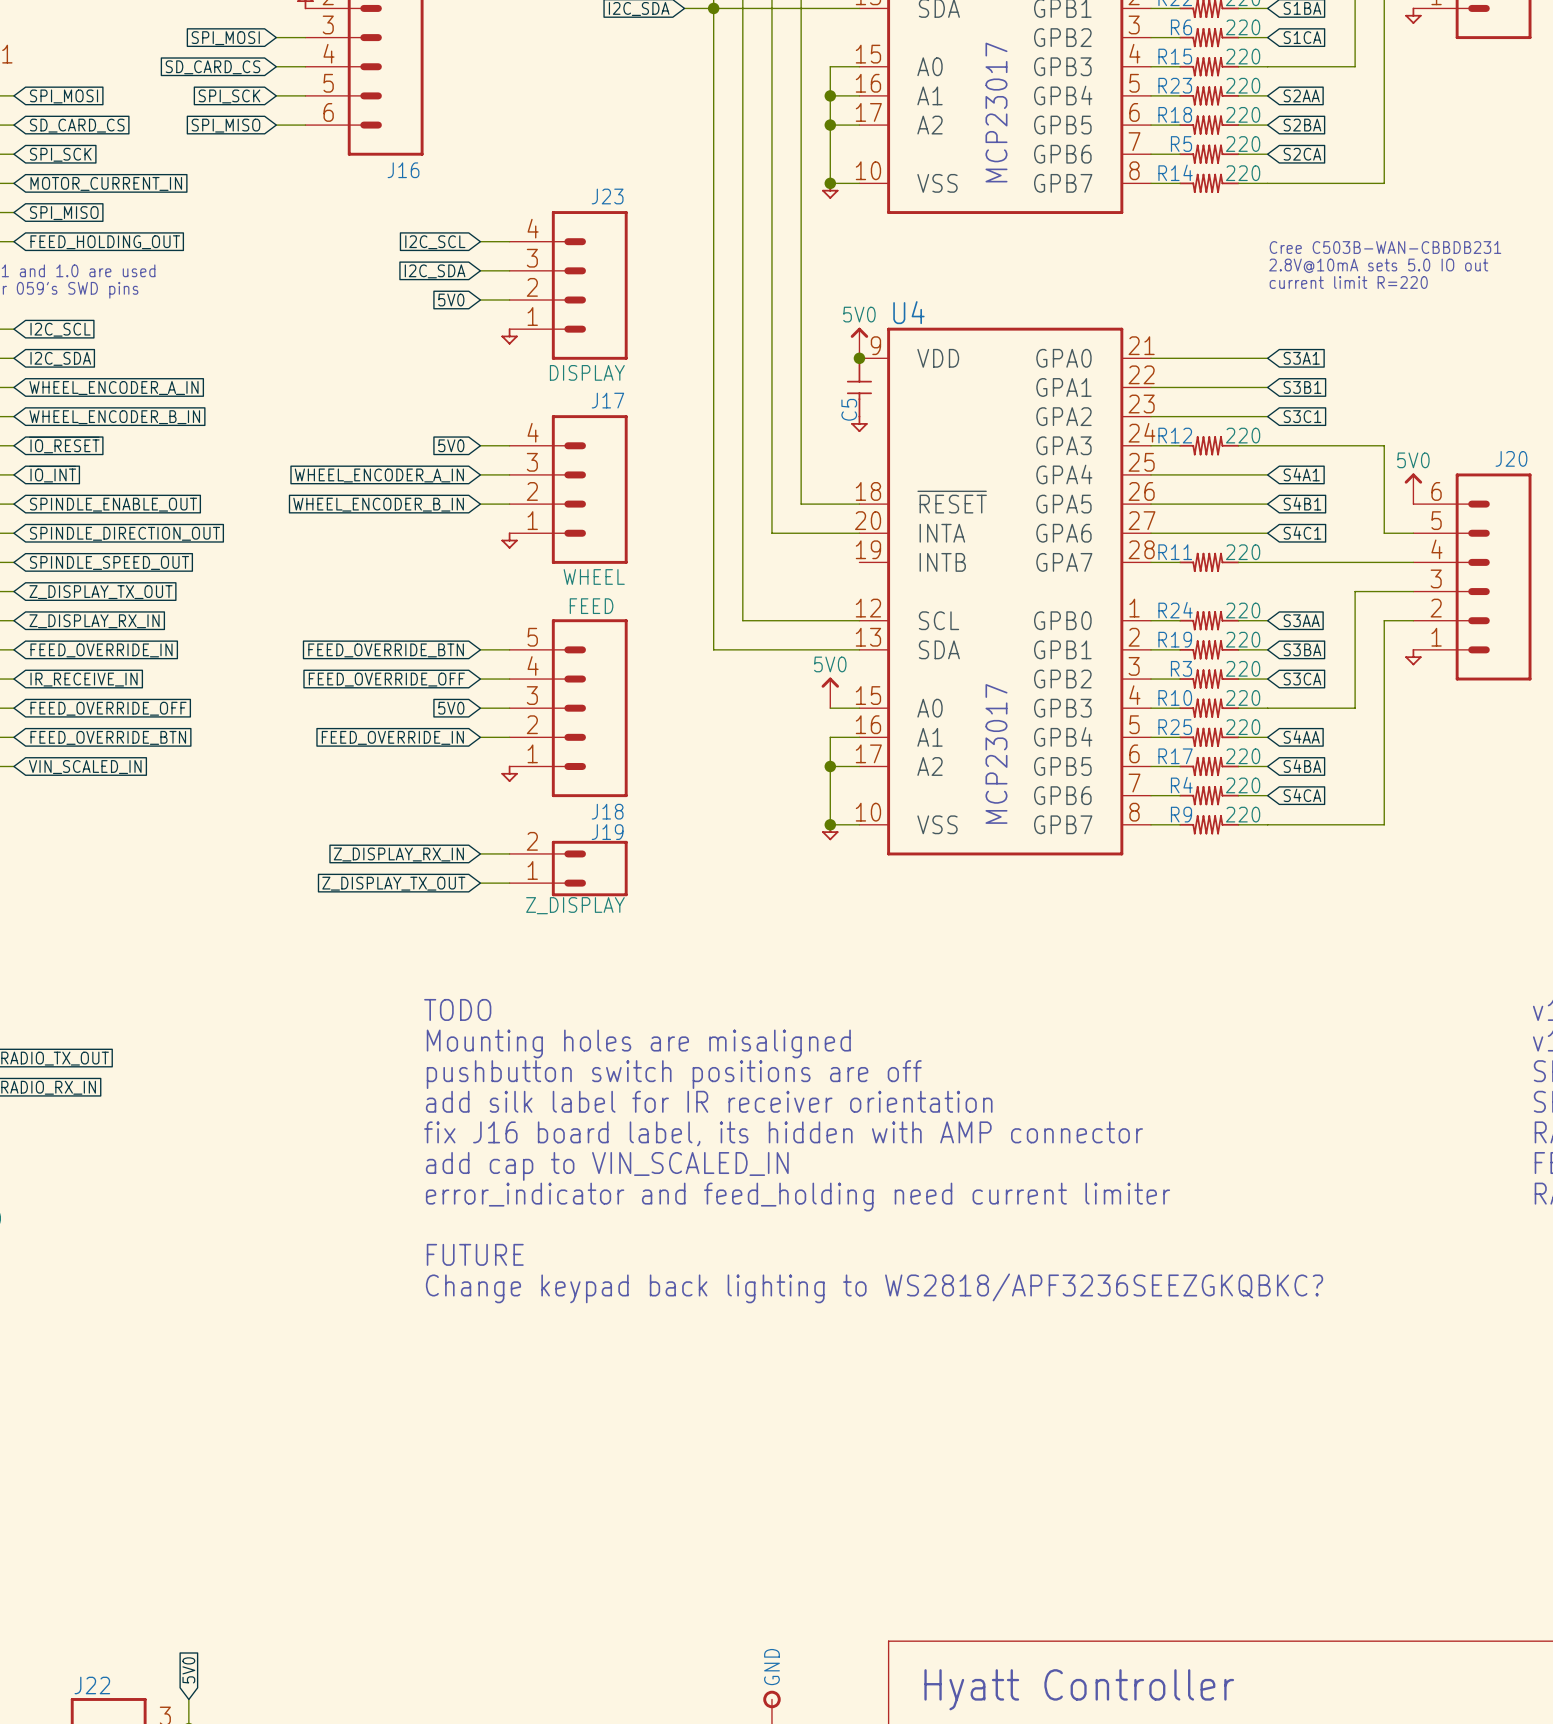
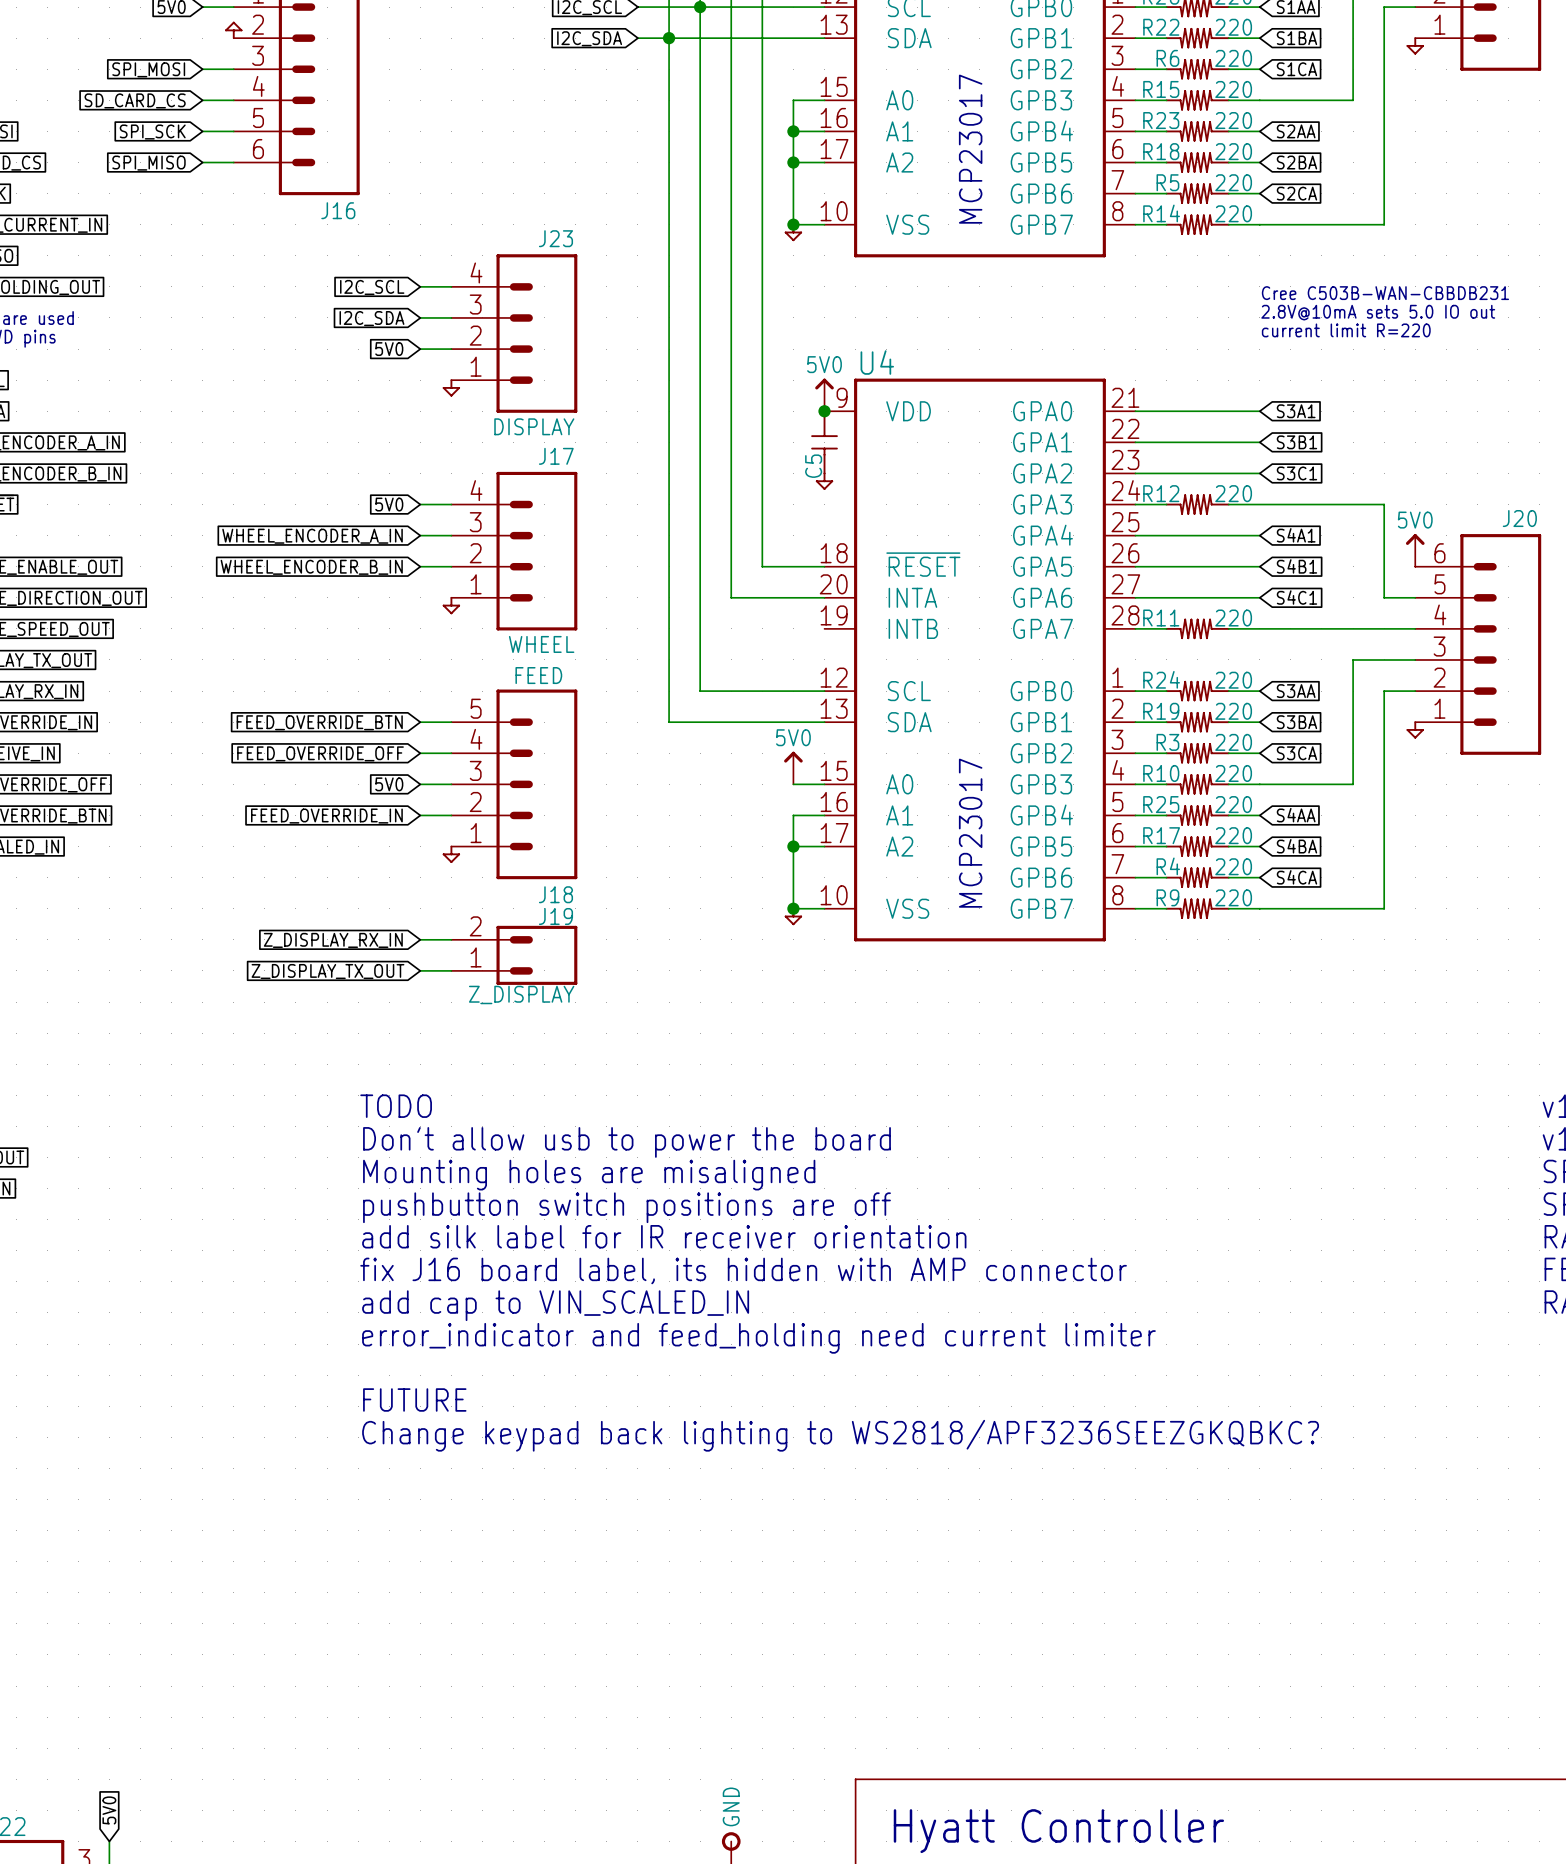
text: Mounting holes are misaligned (638, 1043) -> Don't allow usb to power the board (626, 1142)
text: pushbutton switch positions are off (674, 1074) -> Mounting holes are misaligned (589, 1175)
text: add silk label for IR receiver orientation (709, 1101) -> pushbutton switch positions are off (626, 1207)
text: fix J16 board label, its hidden with AMP connector (783, 1133) -> add silk label for IR receiver orientation (664, 1236)
text: add cap to VIN_SCALED_IN (607, 1166) -> fix J16 board label, its hidden with AMP connector (743, 1270)
text: error_indicator and feed_holding need current limiter (797, 1197) -> add cap to VIN_SCALED_IN (555, 1305)
text: none -> error_indicator and feed_holding need current limiter (758, 1338)
text: FUTURE (475, 1254) -> none
text: Change keypad back lighting to WS2818/APF3236SEEZGKQBKC? (874, 1288) -> FUTURE (414, 1399)
text: none -> Change keypad back lighting to WS2818/APF3236SEEZGKQBKC? (840, 1435)

